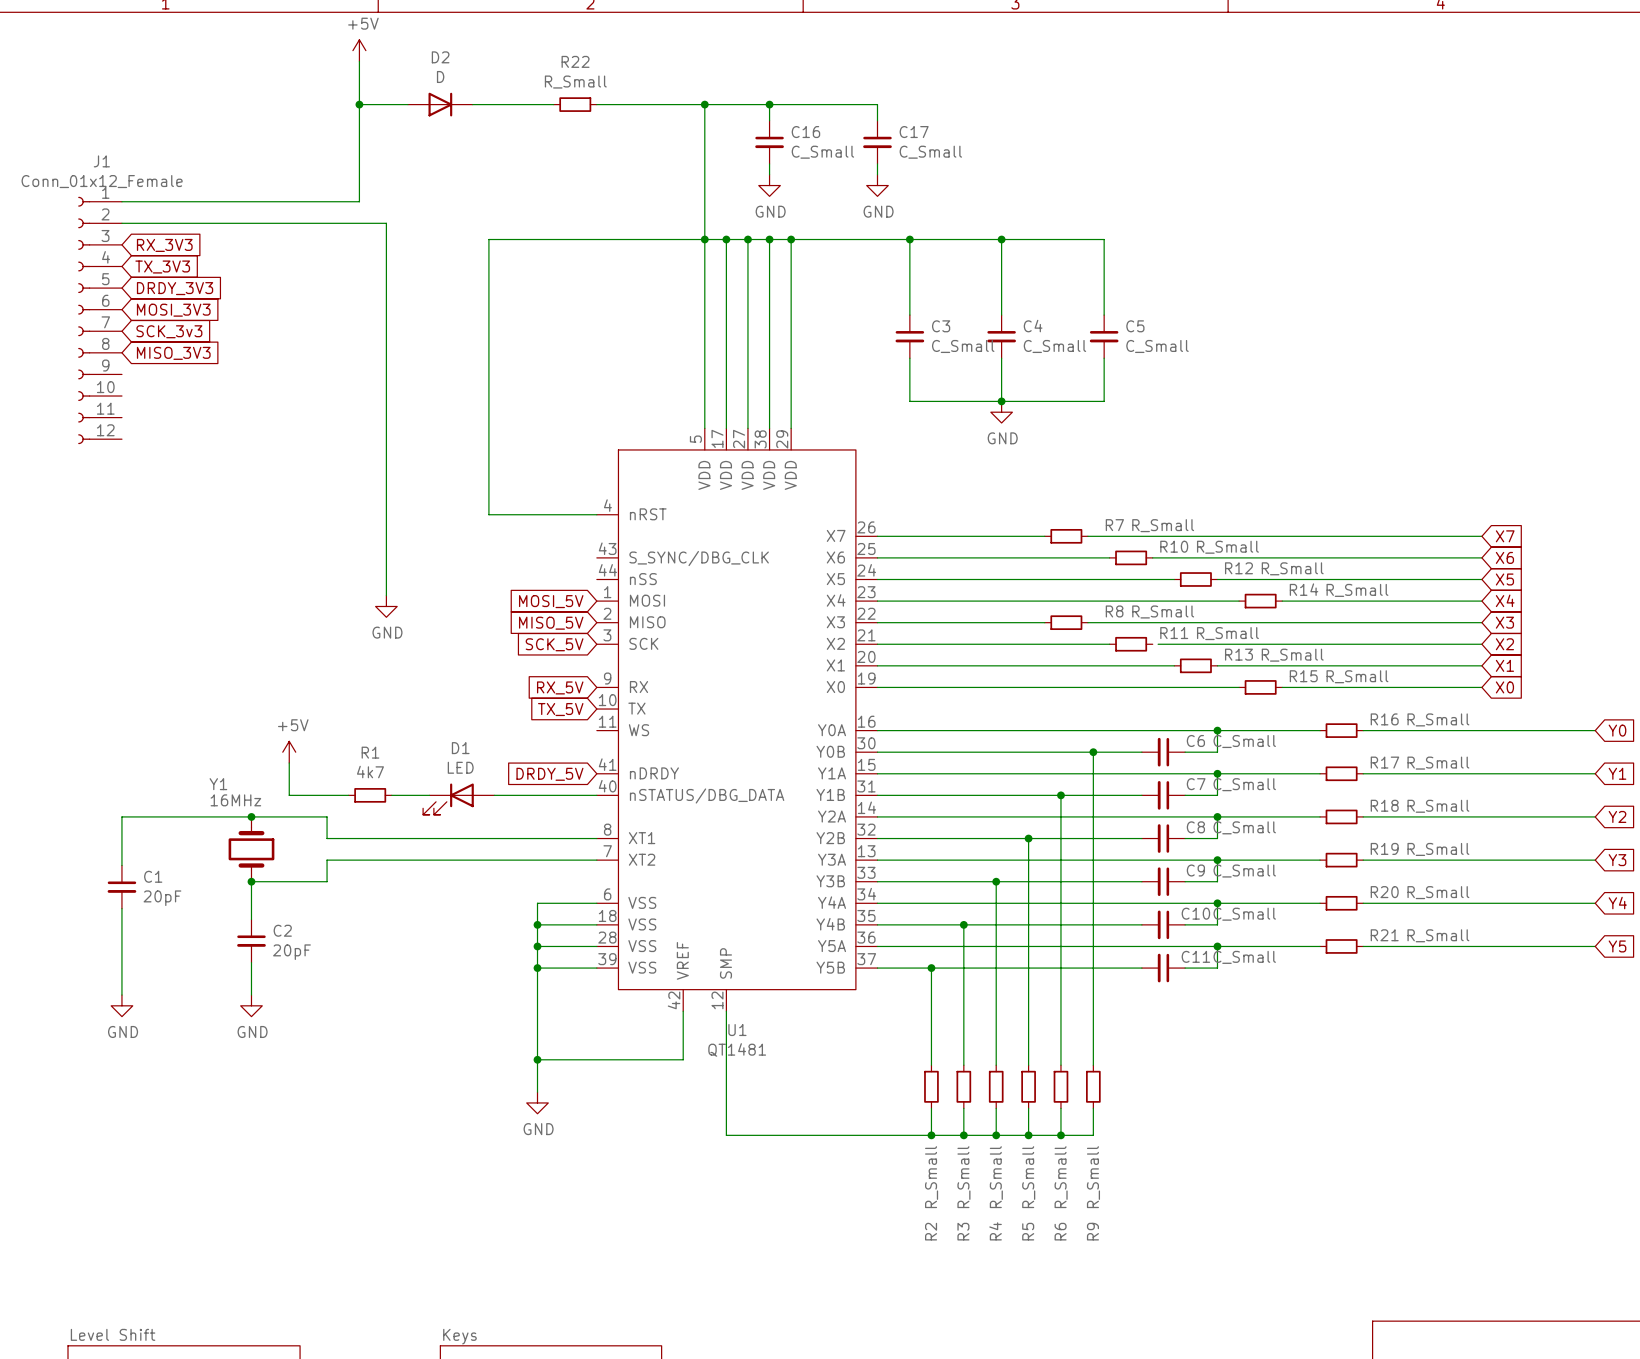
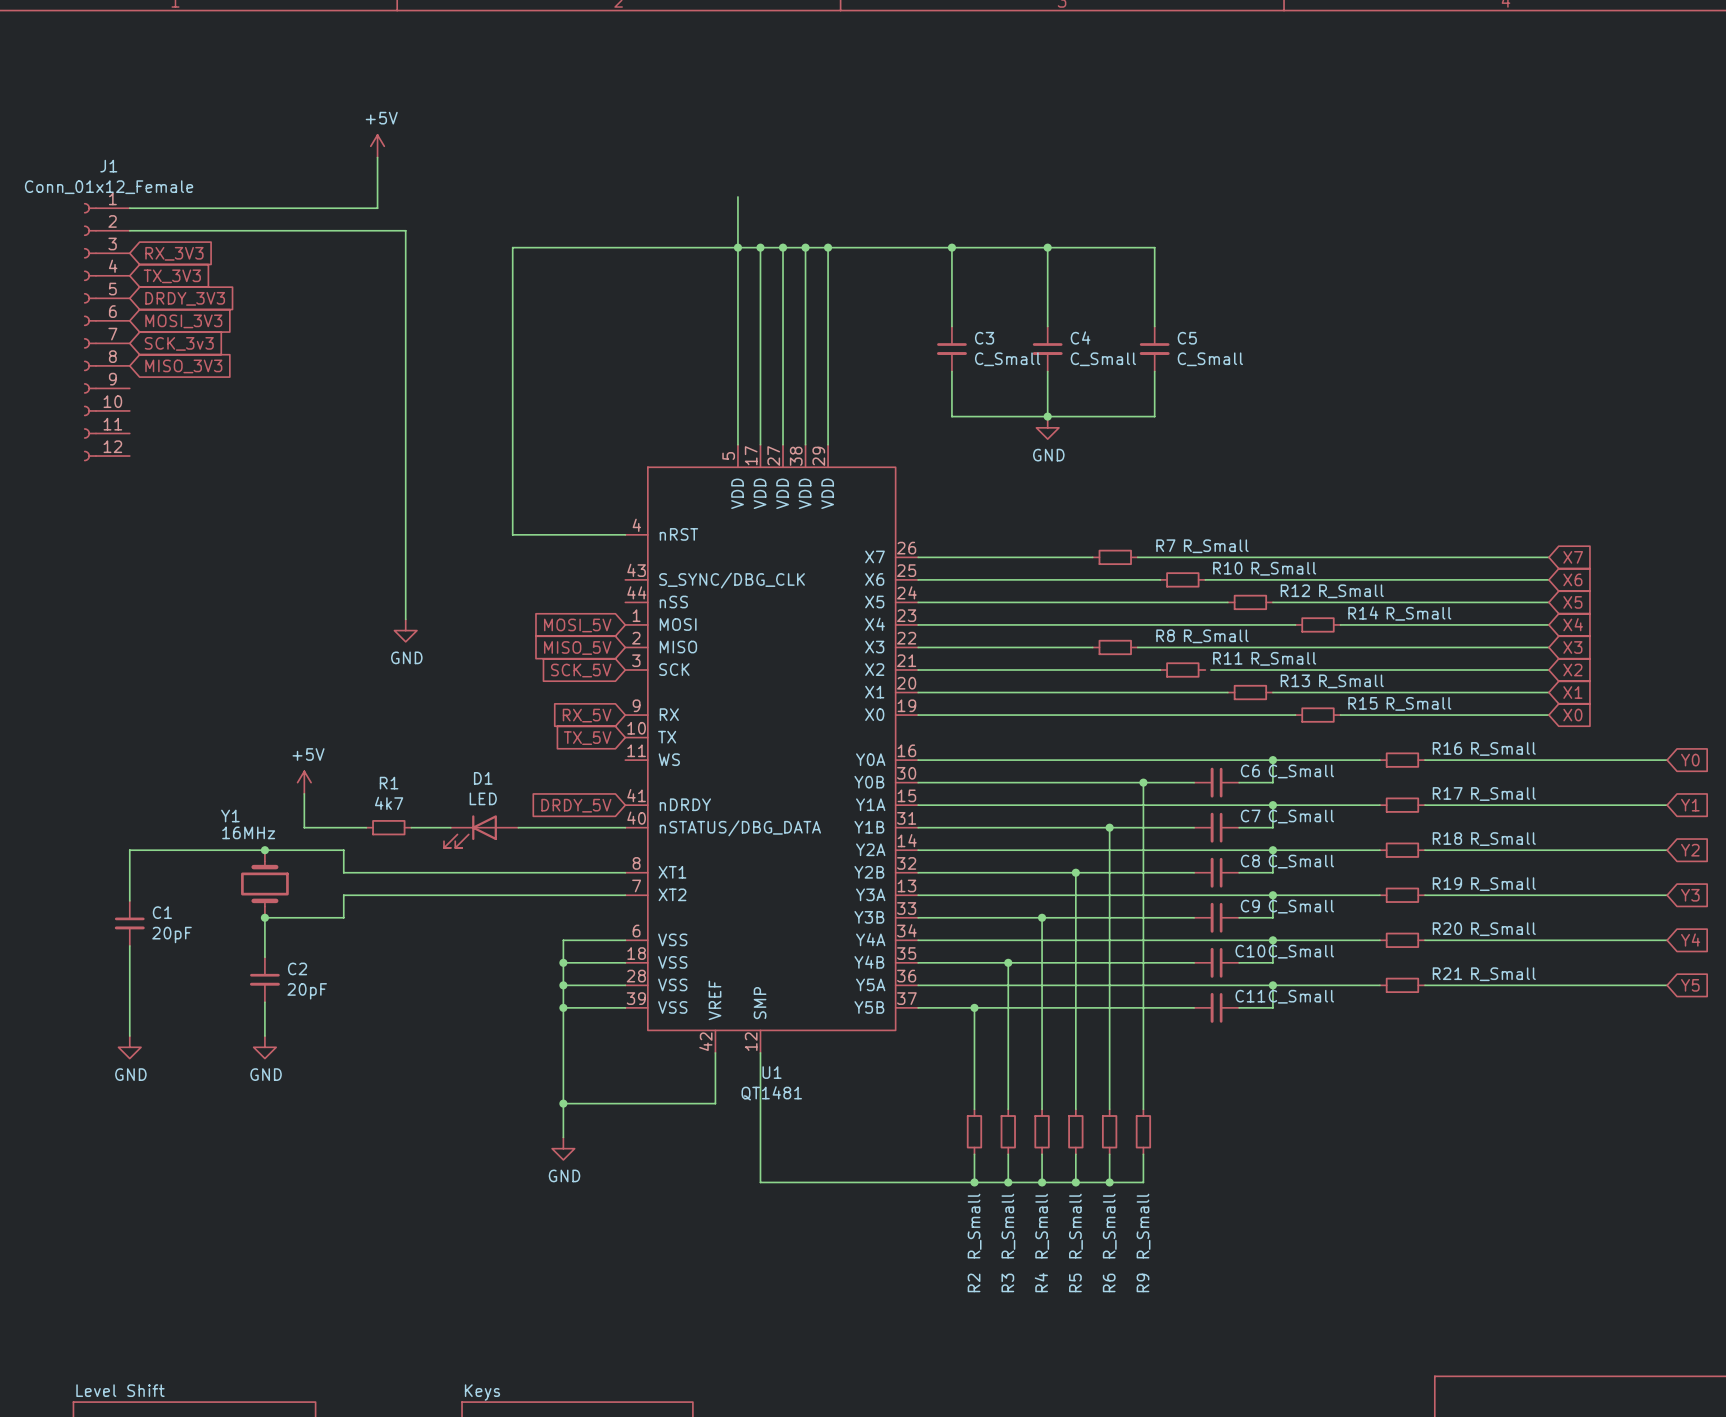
power symbol position: +5V (359, 50) -> +5V (377, 146)
wire: (359, 61) (359, 153) -> none
wire: (359, 104) (407, 104) -> none
junction: (359, 104) -> none
D2: D (440, 104) -> none
wire: (472, 104) (553, 104) -> none
R22: R_Small (575, 104) -> none
wire: (596, 104) (877, 104) (877, 120) -> none
wire: (704, 104) (704, 190) -> none
junction: (704, 104) -> none
wire: (769, 104) (769, 120) -> none
junction: (769, 104) -> none
C16: C_Small (769, 142) -> none
C17: C_Small (877, 142) -> none
wire: (769, 163) (769, 174) -> none
wire: (877, 163) (877, 174) -> none
power symbol: GND (769, 185) -> none
power symbol: GND (877, 185) -> none

